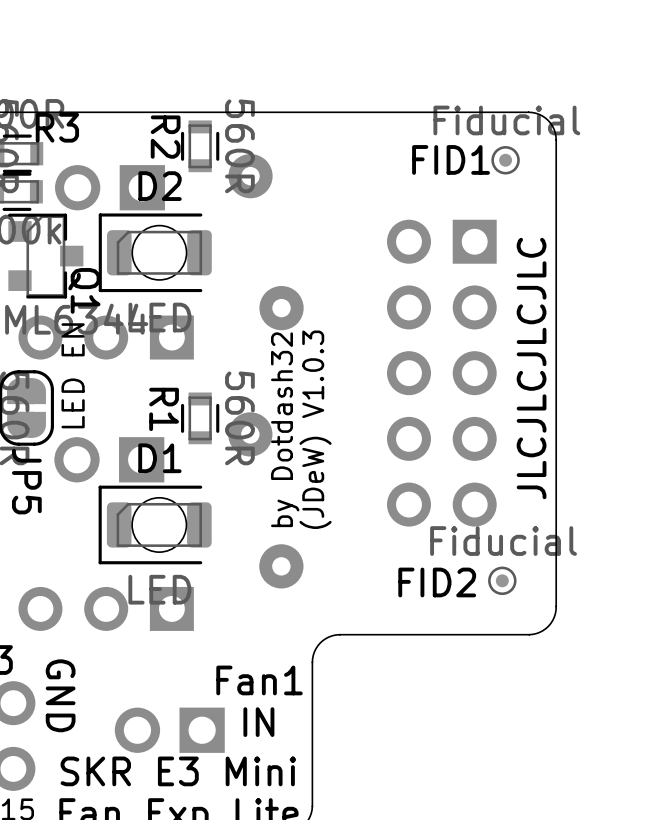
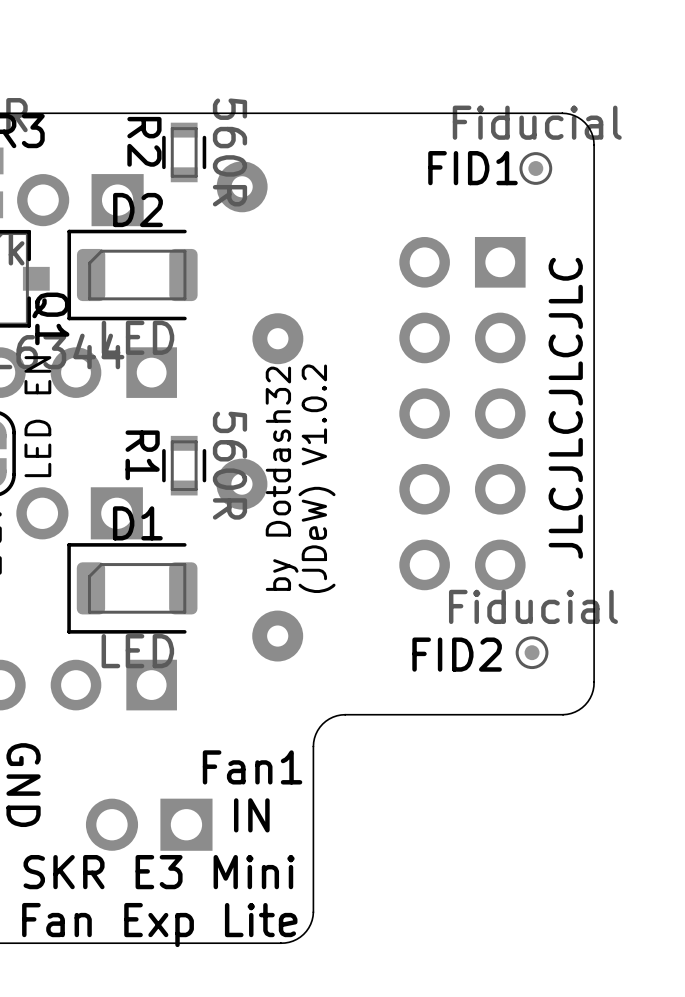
D2 footprint: [98, 213, 212, 293] -> [67, 229, 198, 321]
text: (JDeW) V1.0.3 (315, 429) -> (JDeW) V1.0.2 (317, 478)
D1 footprint: [98, 485, 212, 565] -> [67, 543, 198, 634]

